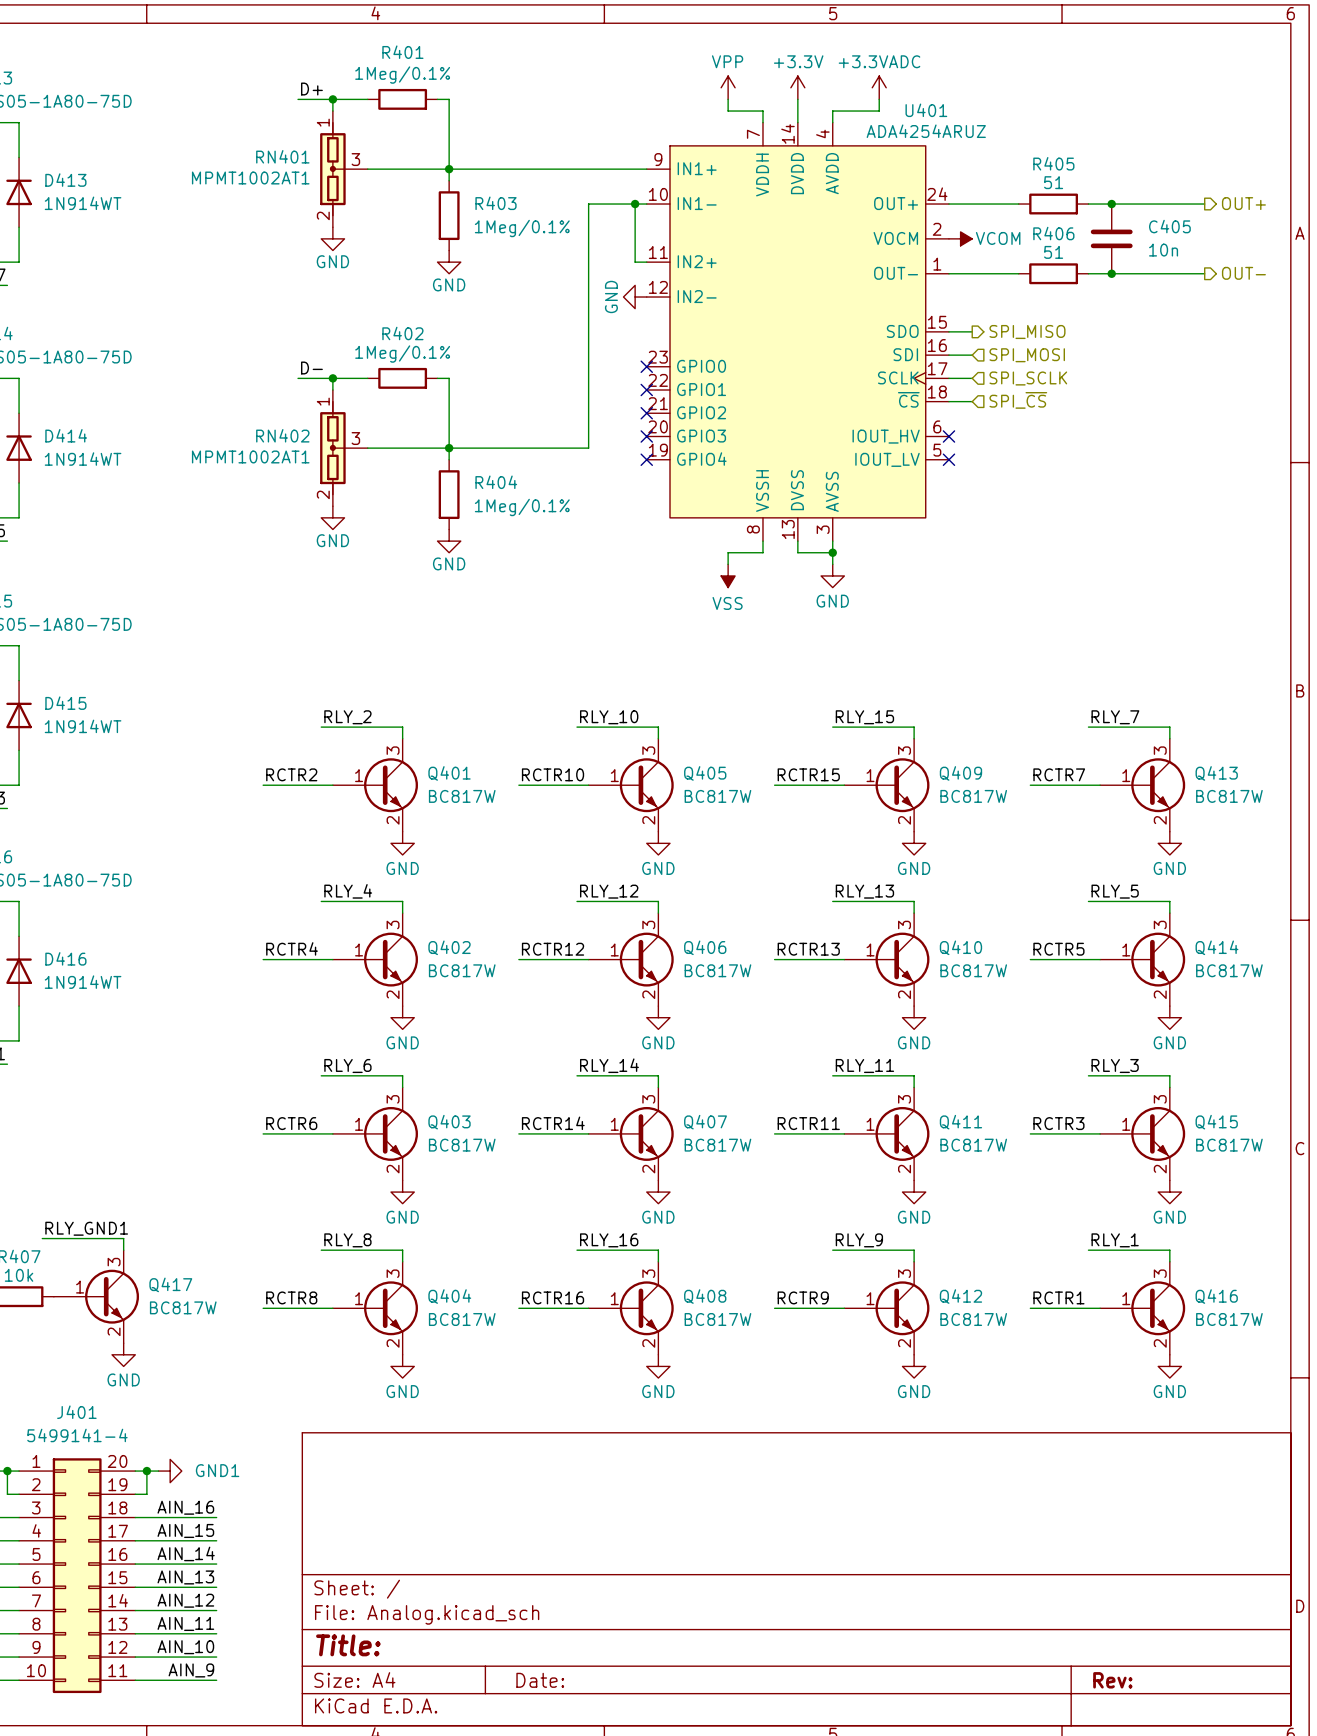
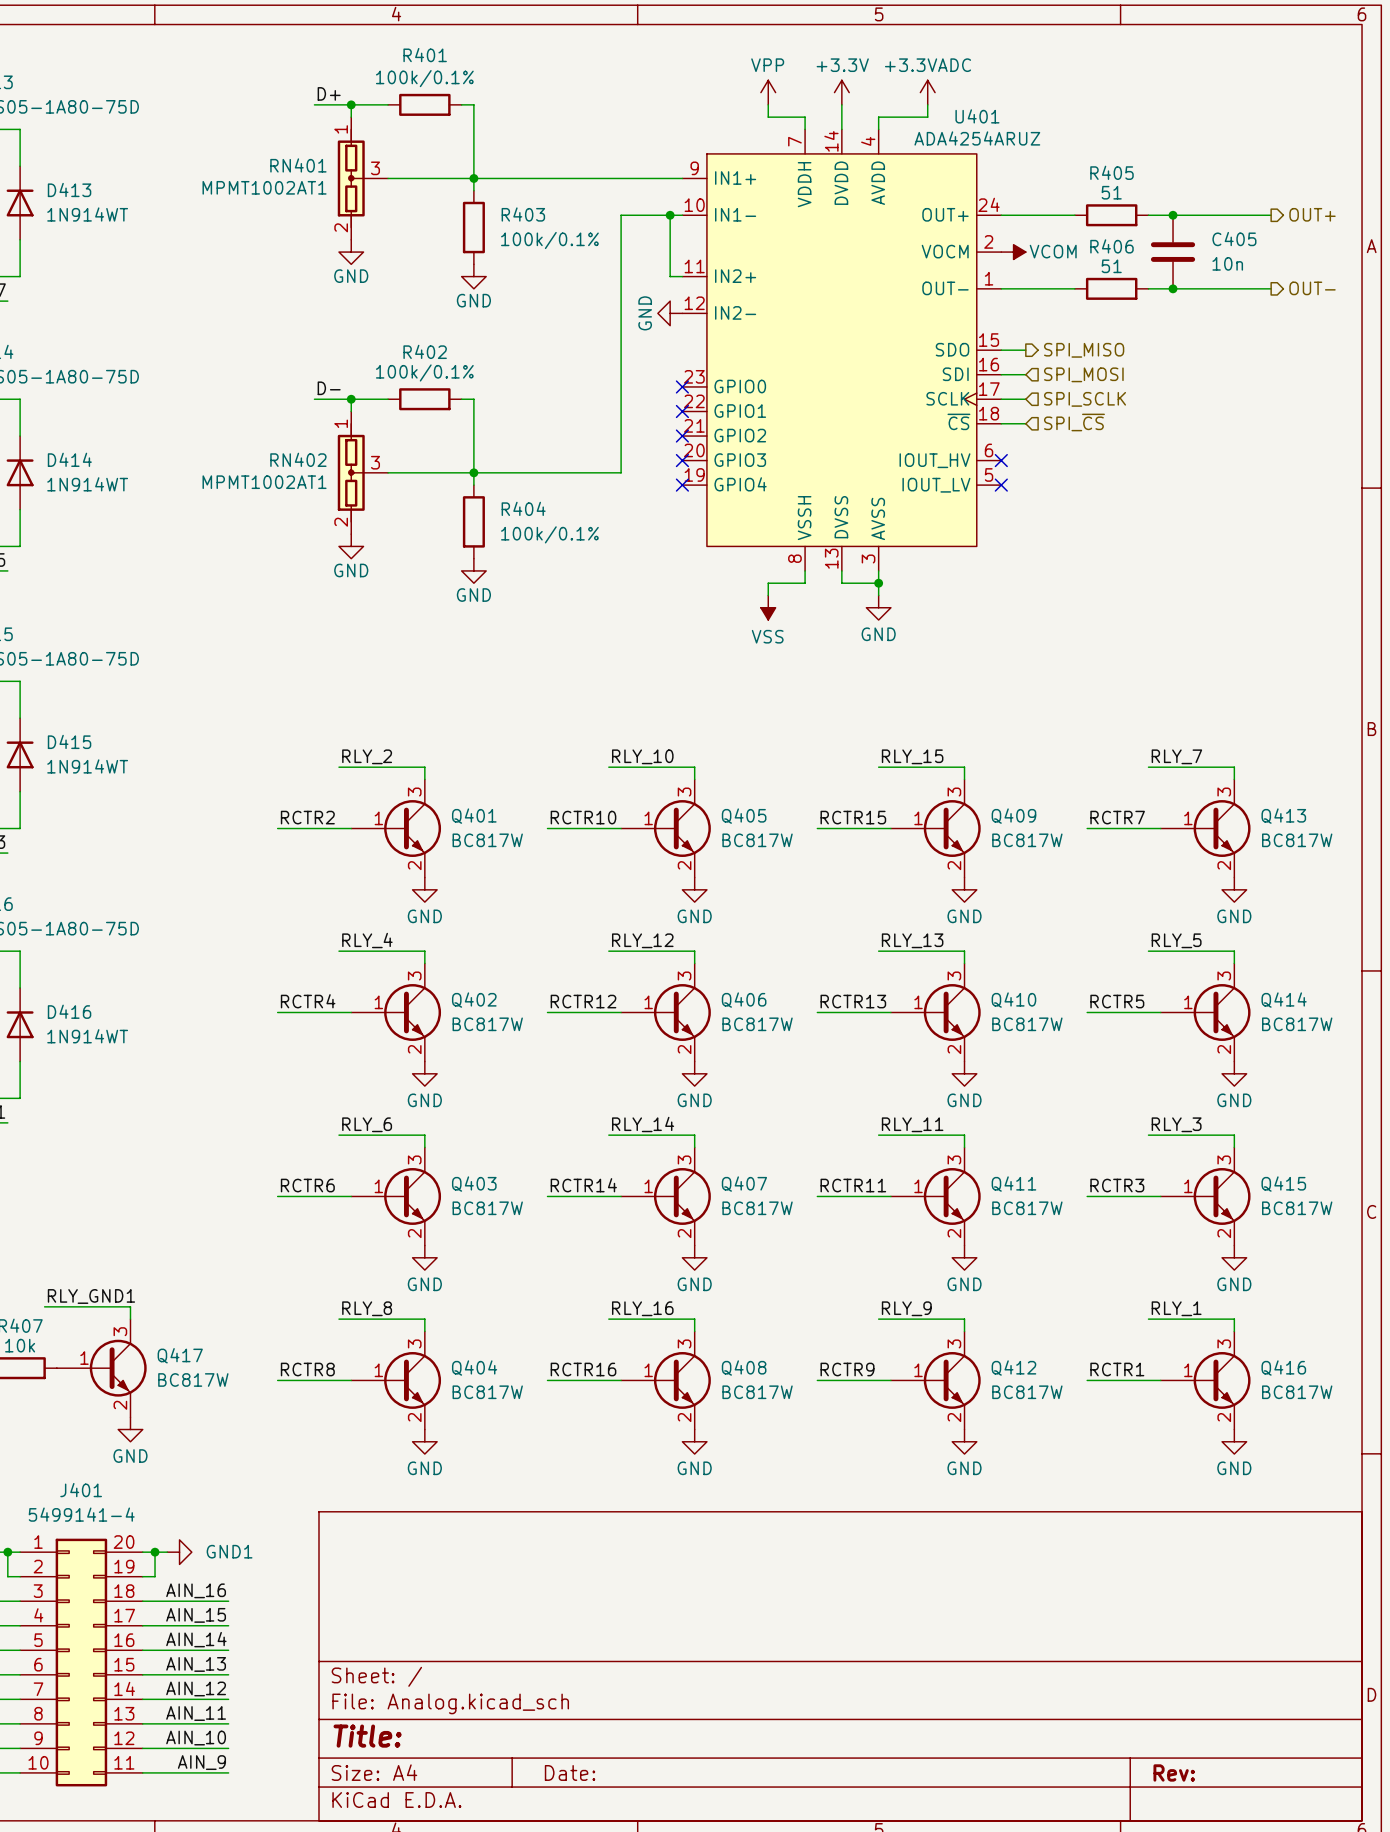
R401 value: 1Meg/0.1% (402, 75) -> 100k/0.1% (424, 78)
R403 value: 1Meg/0.1% (522, 228) -> 100k/0.1% (549, 240)
R402 value: 1Meg/0.1% (402, 354) -> 100k/0.1% (424, 372)
R404 value: 1Meg/0.1% (522, 507) -> 100k/0.1% (549, 534)

